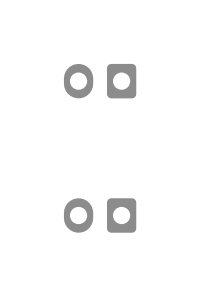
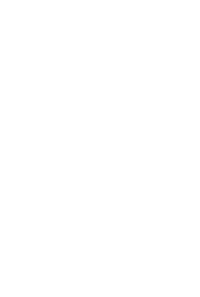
part: (100, 81) -> none
part: (100, 215) -> none

